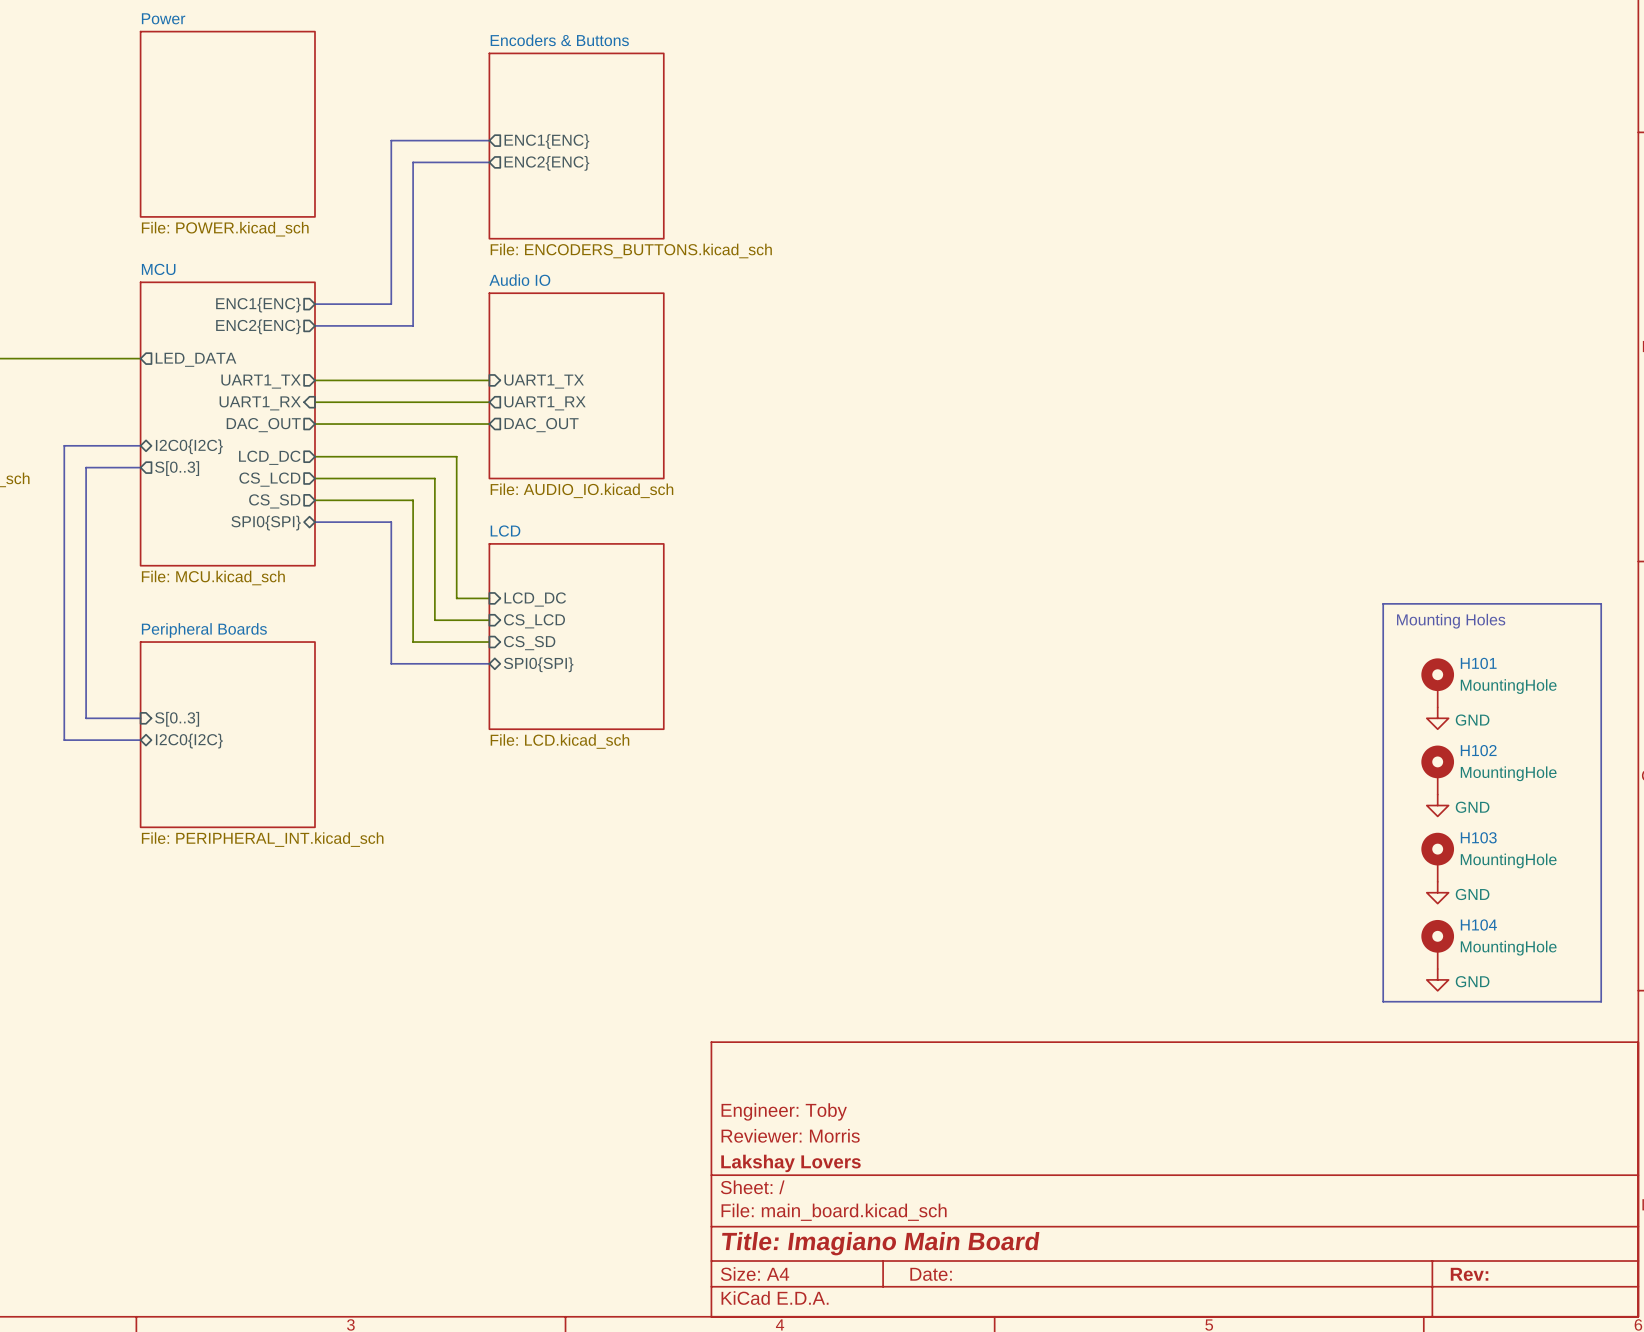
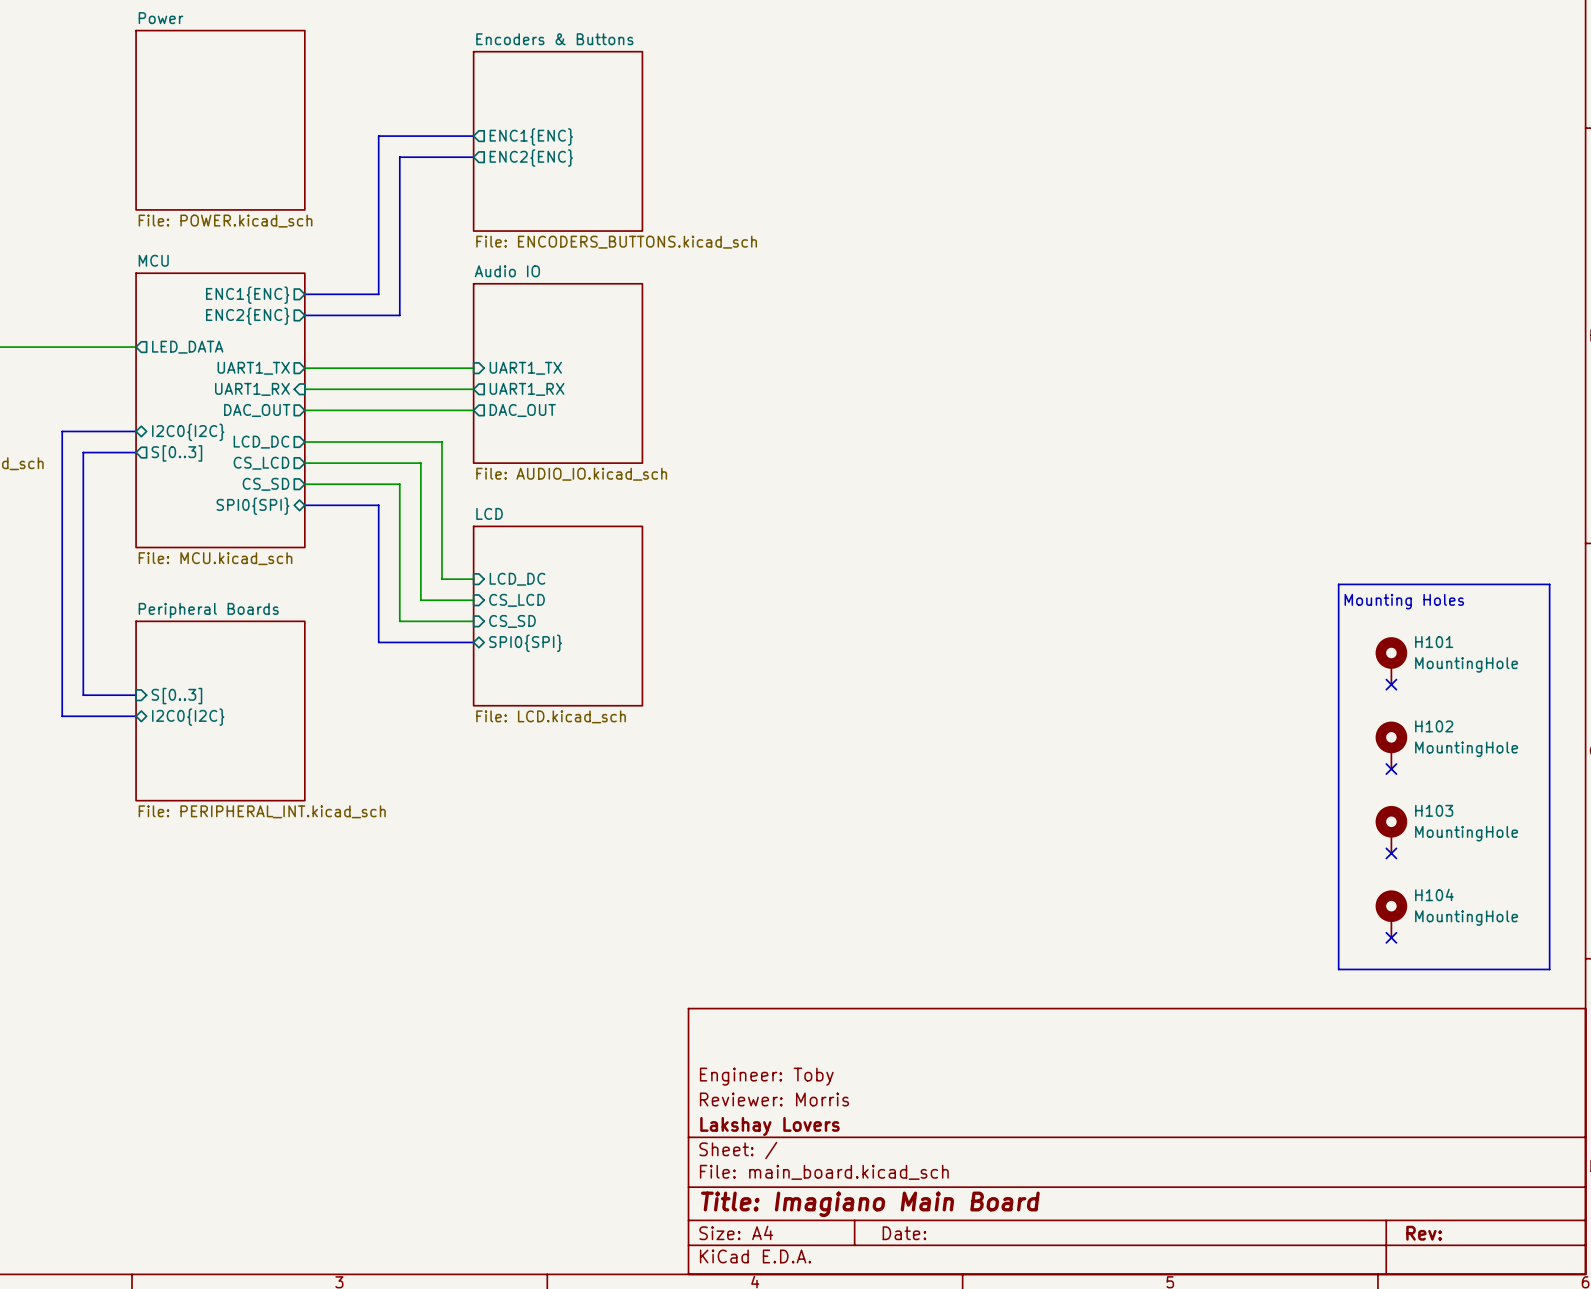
no-connect mark: none -> (1391, 684)
power symbol: GND (1437, 718) -> none
no-connect mark: none -> (1391, 769)
power symbol: GND (1437, 805) -> none
no-connect mark: none -> (1391, 853)
power symbol: GND (1437, 892) -> none
no-connect mark: none -> (1391, 937)
power symbol: GND (1437, 979) -> none

